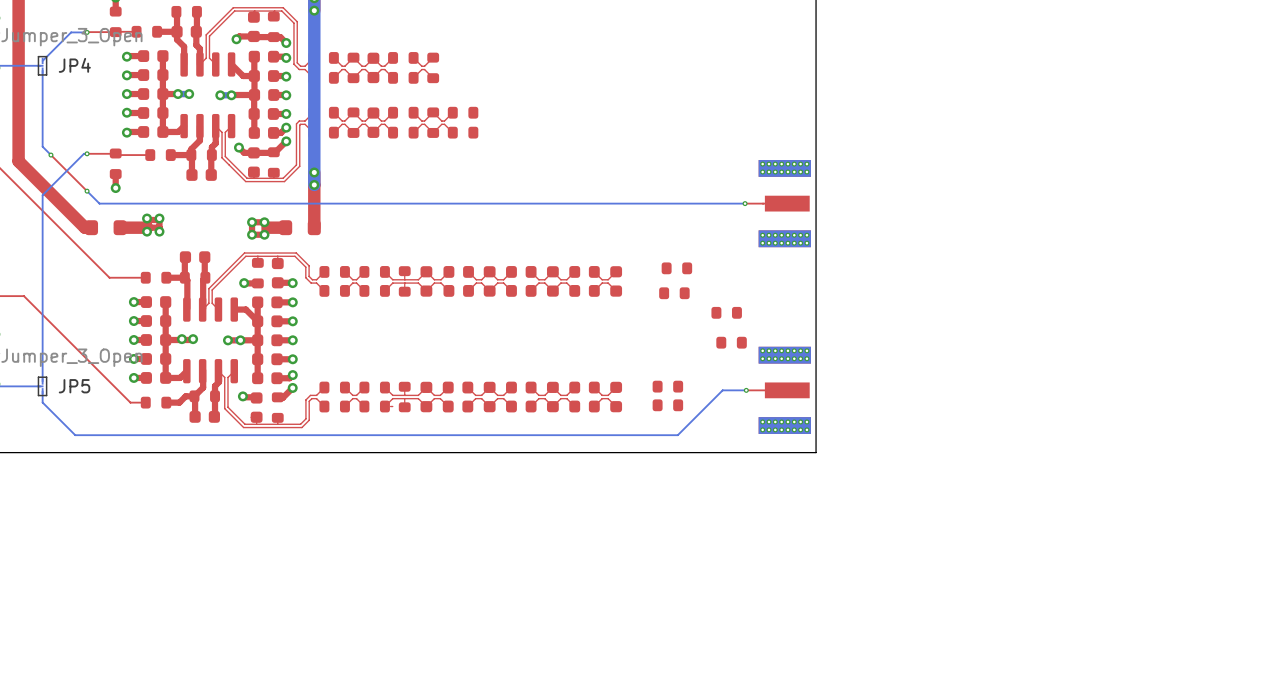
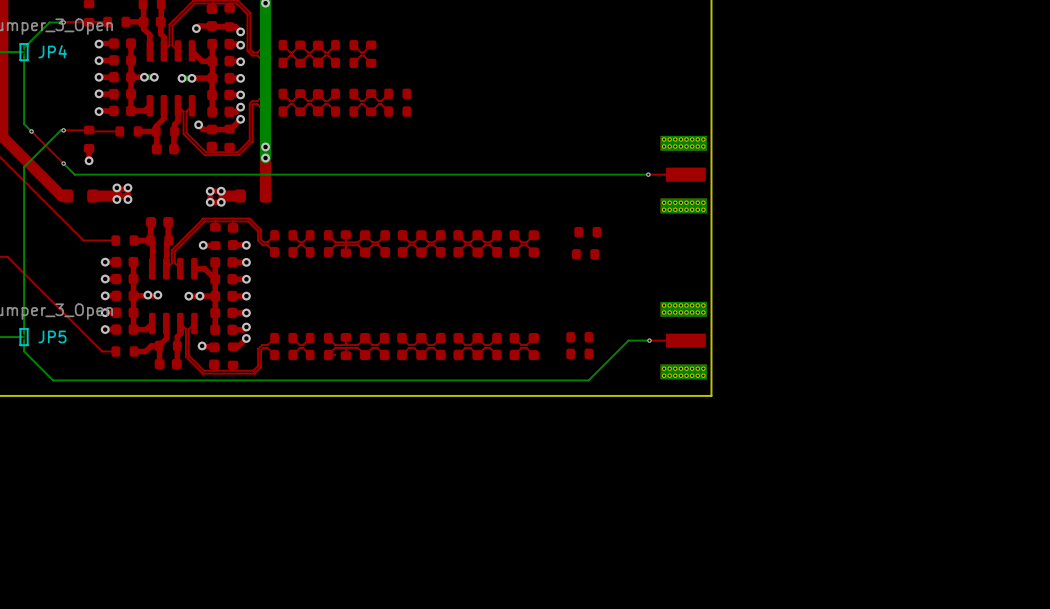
part: (726, 312) -> none
part: (731, 342) -> none

